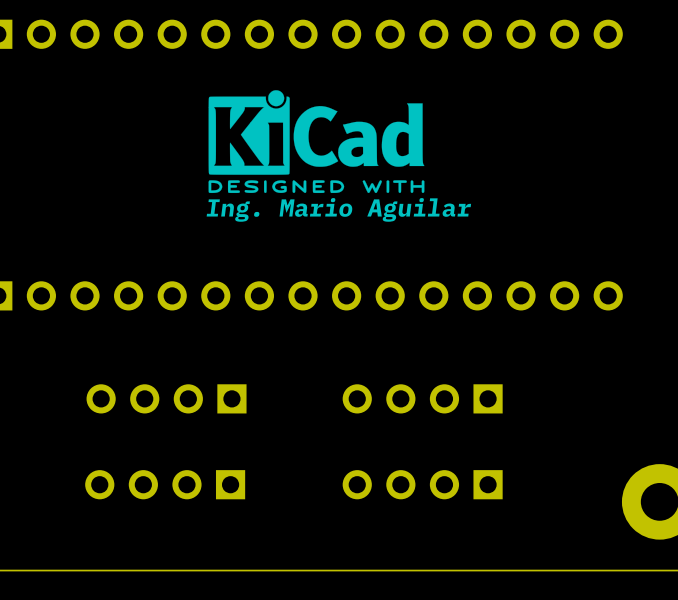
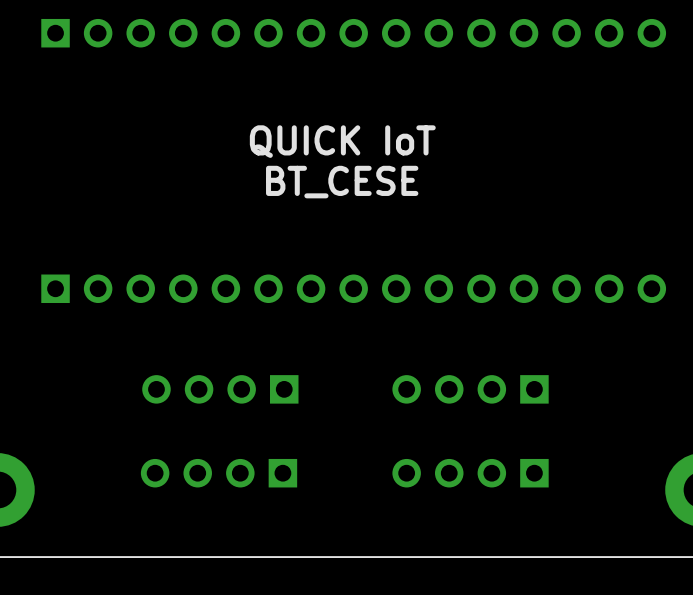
drawing: [208, 90, 425, 194] -> none
text: none -> QUICK IoT (342, 141)
text: none -> BT_CESE (342, 182)
text: Ing. Mario Aguilar (338, 209) -> none

